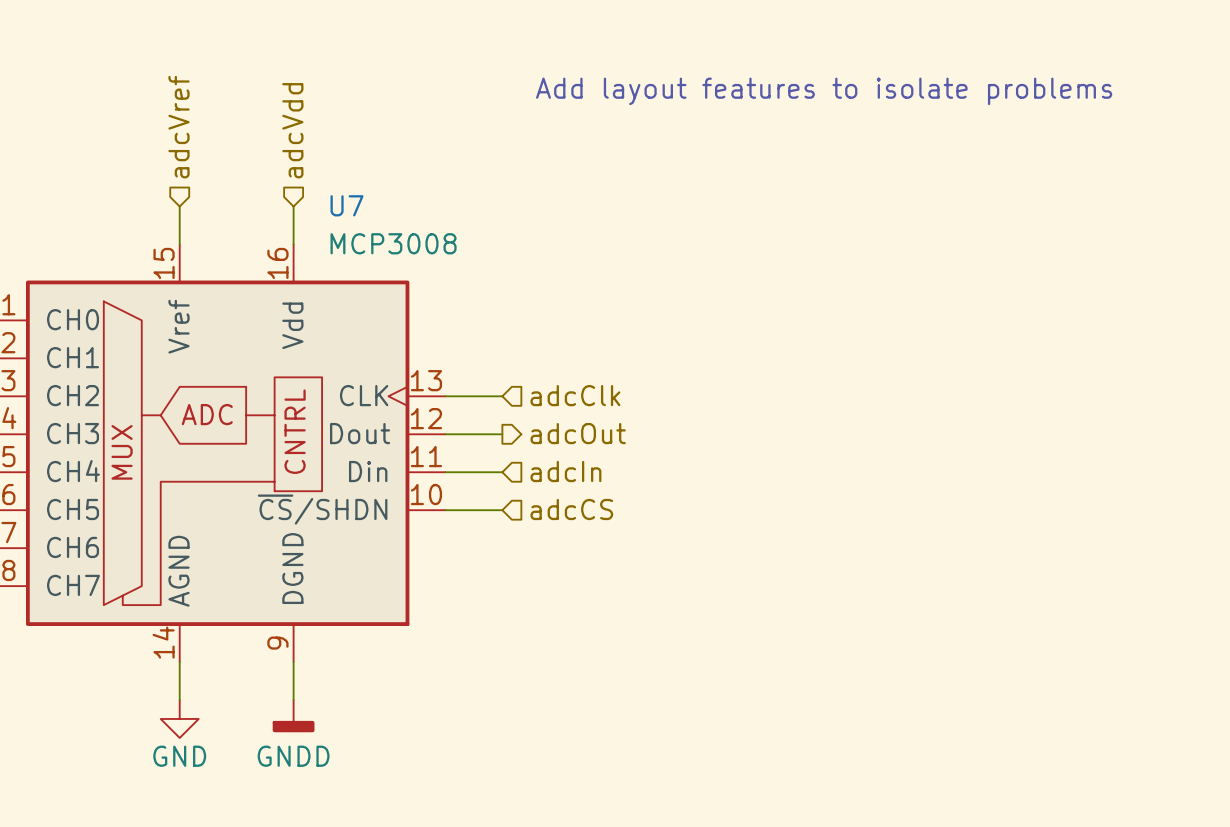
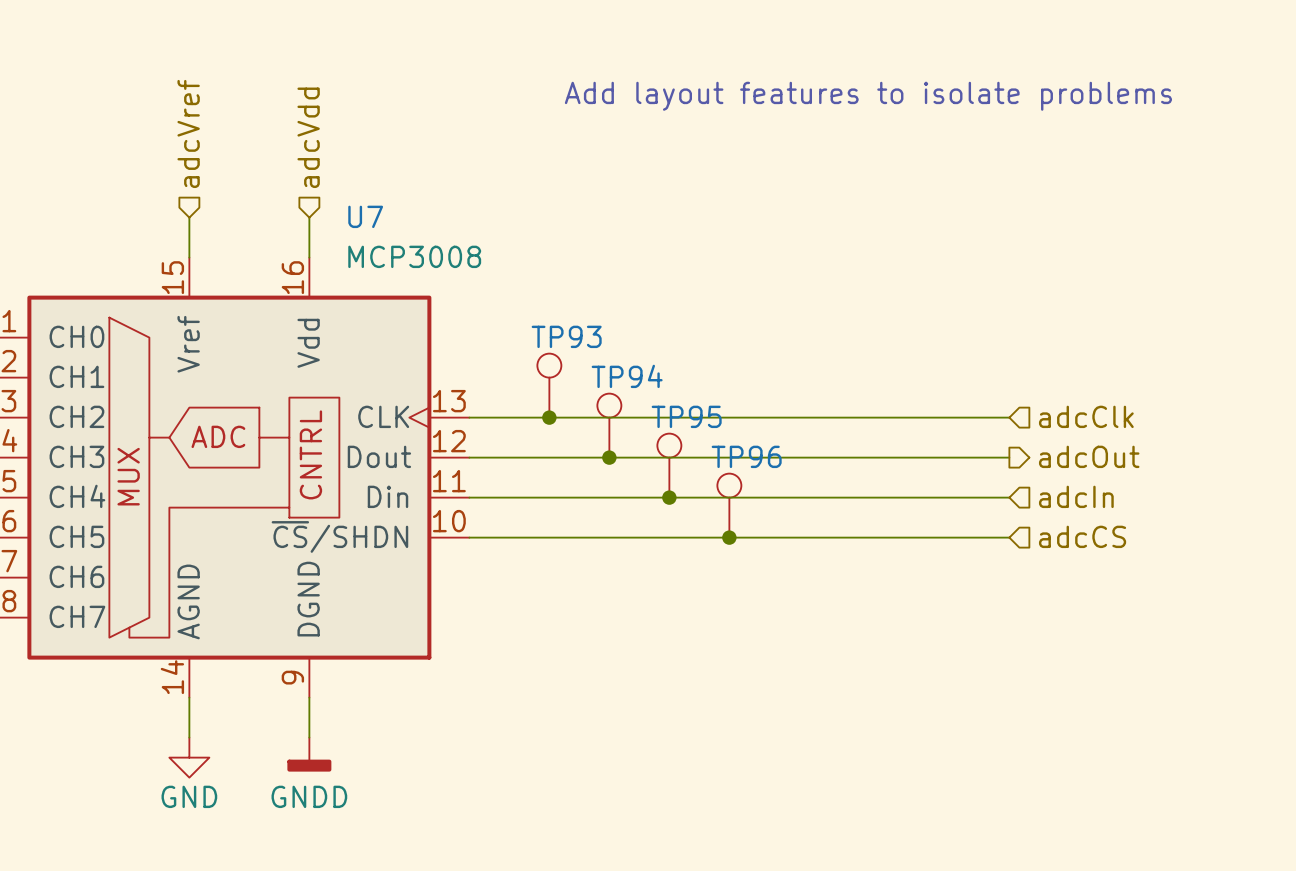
TP93: none -> (549, 385)
hierarchical label: adcClk (575, 395) -> none
hierarchical label: none -> adcClk (1086, 416)
wire: none -> (529, 417) (1009, 417)
junction: none -> (549, 417)
TP94: none -> (609, 425)
hierarchical label: adcOut (578, 433) -> none
hierarchical label: none -> adcOut (1089, 456)
wire: none -> (529, 457) (1009, 457)
junction: none -> (609, 457)
TP95: none -> (669, 465)
hierarchical label: adcIn (565, 471) -> none
hierarchical label: none -> adcIn (1076, 496)
wire: none -> (529, 497) (1009, 497)
junction: none -> (669, 497)
TP96: none -> (729, 505)
hierarchical label: adcCS (571, 509) -> none
hierarchical label: none -> adcCS (1082, 536)
wire: none -> (529, 537) (1009, 537)
junction: none -> (729, 537)

